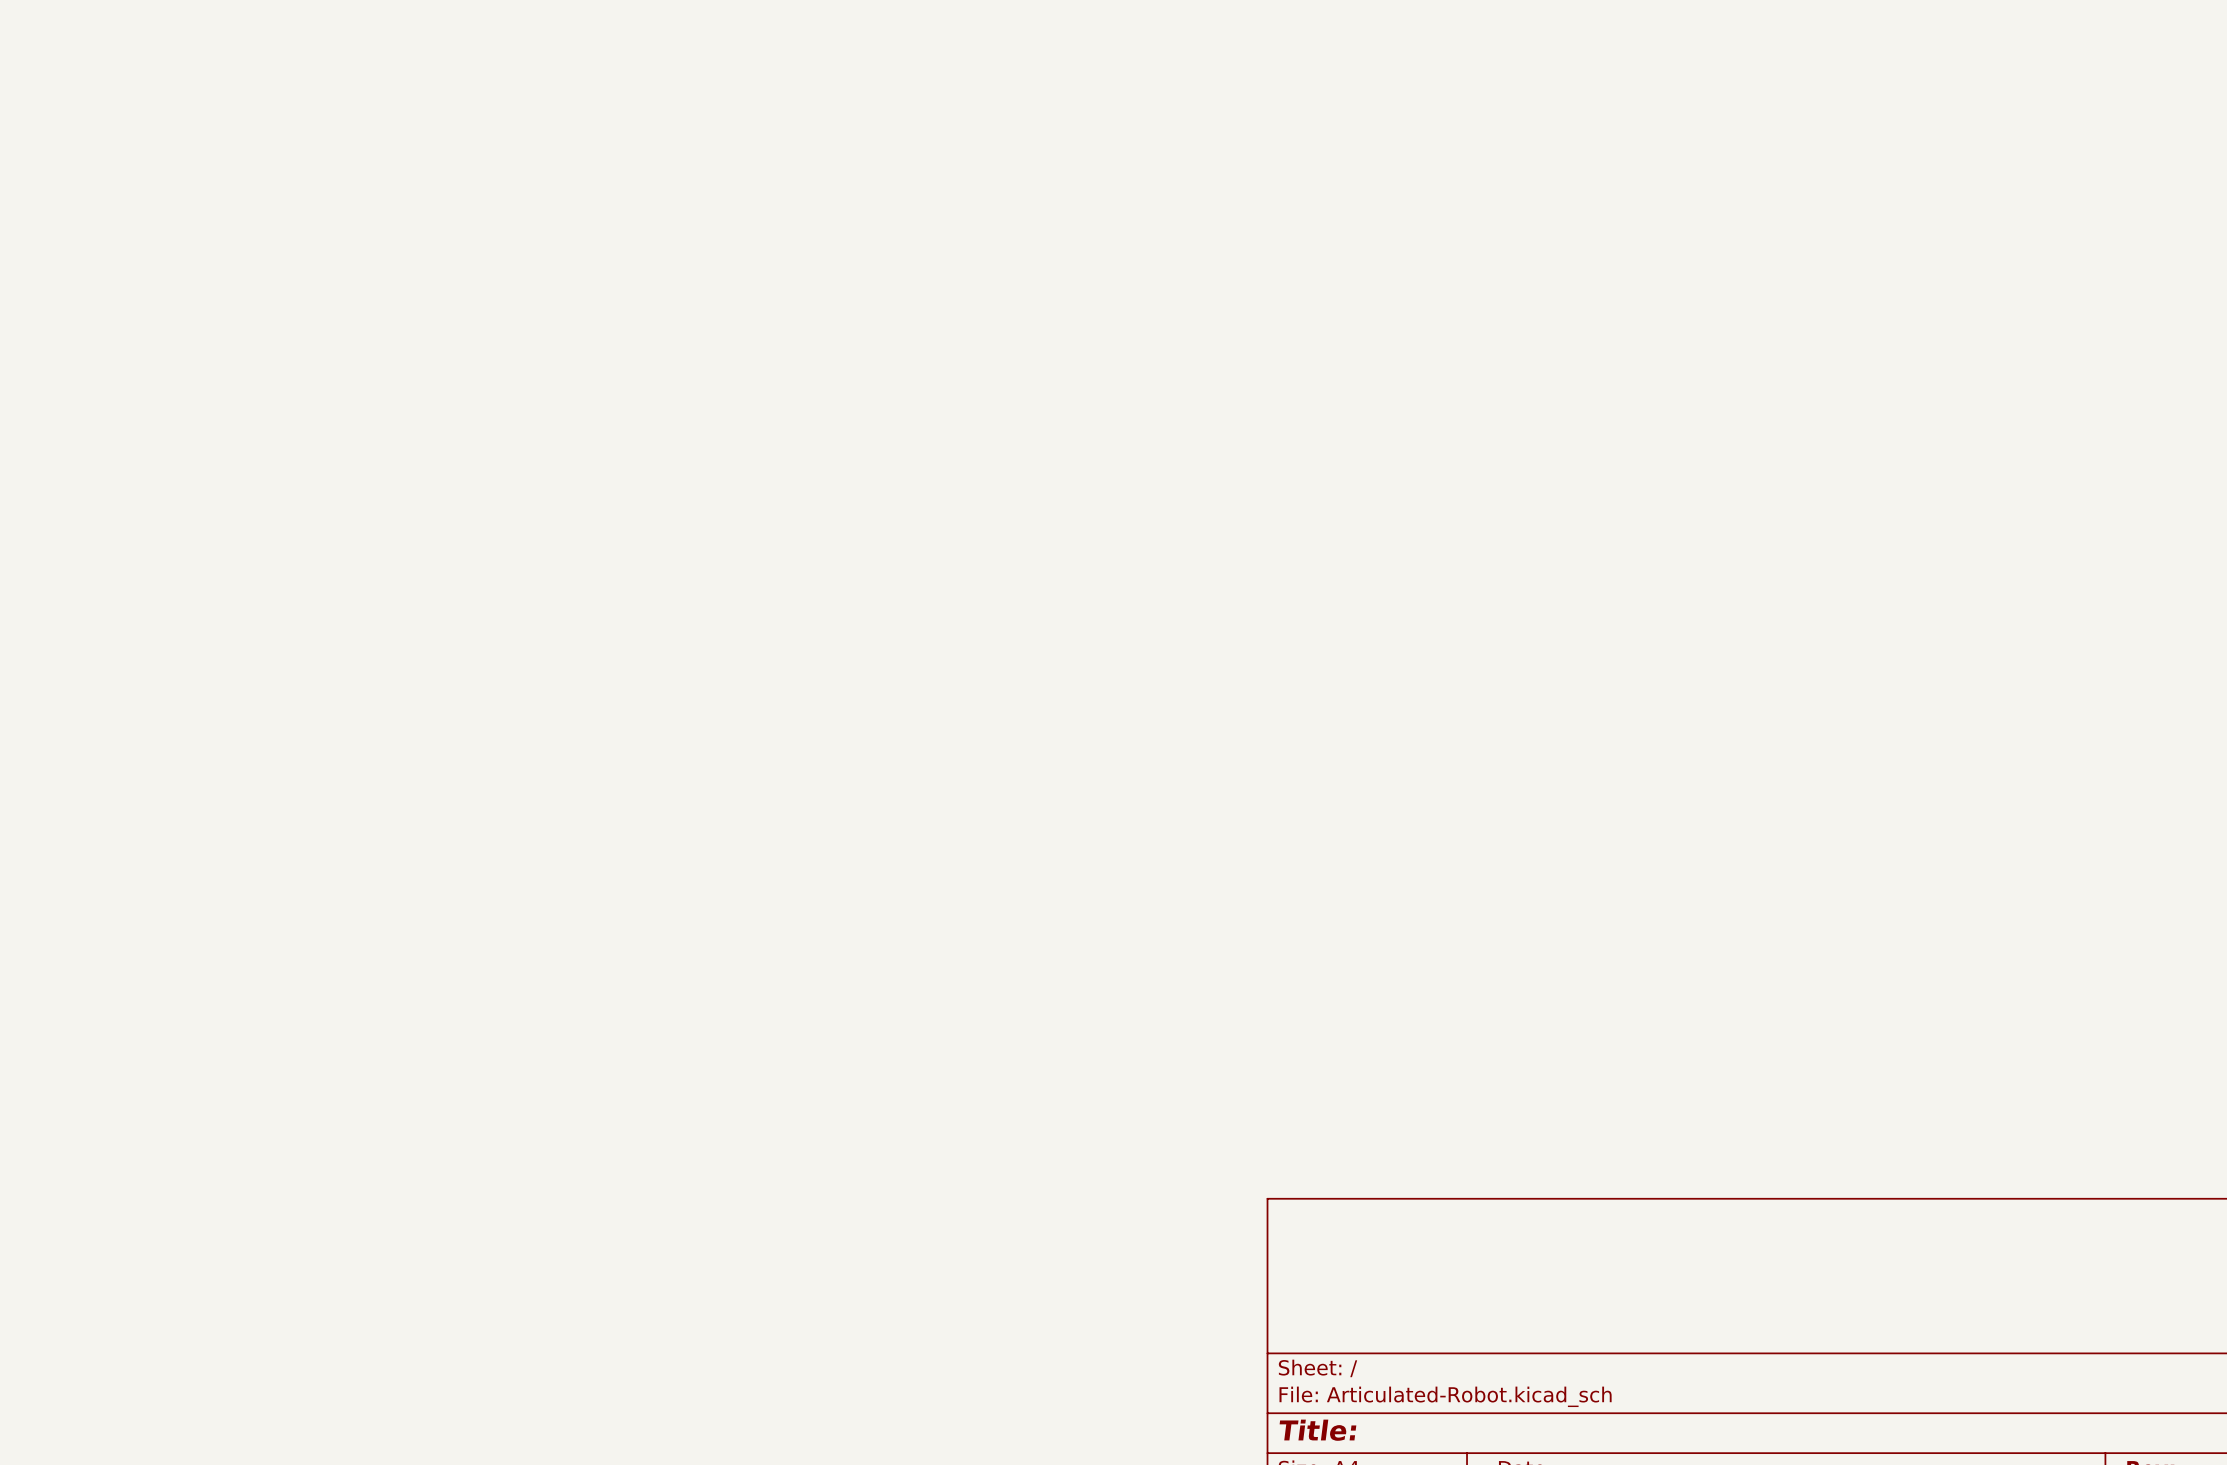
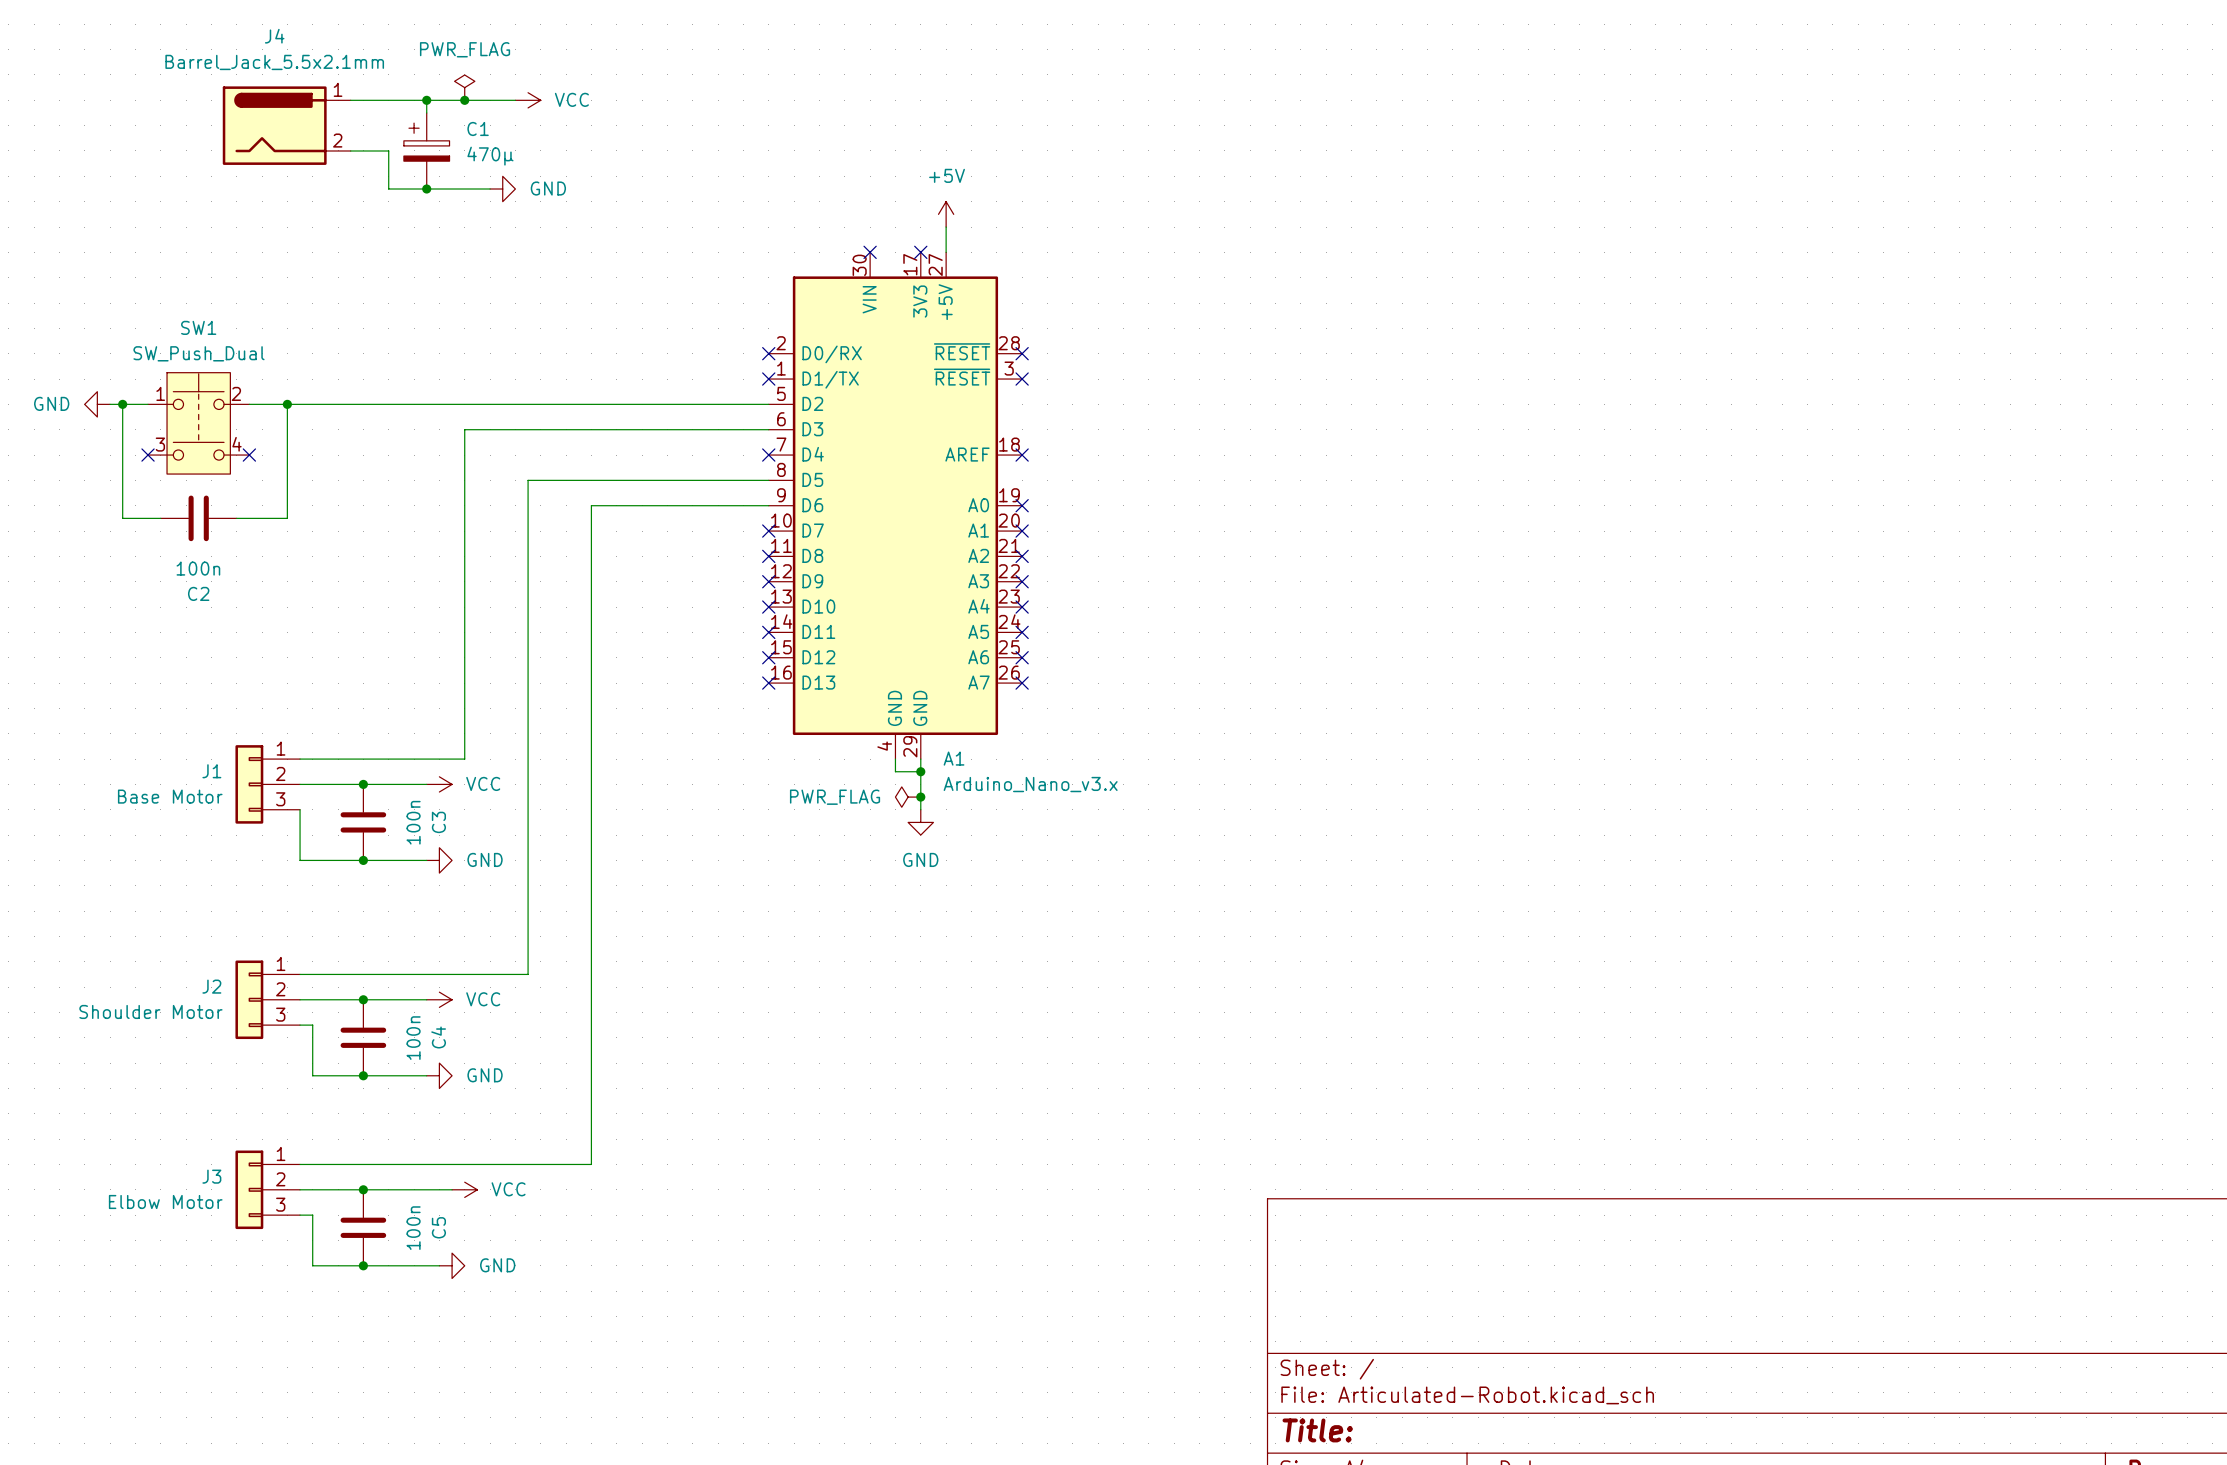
power symbol: none -> PWR_FLAG (464, 87)
wire: none -> (350, 100) (515, 100)
wire: none -> (426, 100) (426, 112)
junction: none -> (426, 100)
junction: none -> (464, 100)
power symbol: none -> VCC (528, 100)
J4: none -> Barrel_Jack_5.5x2.1mm (286, 125)
wire: none -> (350, 150) (388, 150) (388, 189) (490, 189)
C1: none -> 470µ (426, 150)
junction: none -> (426, 189)
power symbol: none -> GND (502, 189)
power symbol: none -> +5V (946, 214)
wire: none -> (946, 227) (946, 252)
no-connect mark: none -> (870, 252)
no-connect mark: none -> (920, 252)
no-connect mark: none -> (768, 353)
no-connect mark: none -> (1022, 353)
no-connect mark: none -> (768, 379)
no-connect mark: none -> (1022, 379)
power symbol: none -> GND (97, 404)
wire: none -> (110, 404) (148, 404)
wire: none -> (122, 404) (122, 518) (160, 518)
junction: none -> (122, 404)
wire: none -> (249, 404) (768, 404)
wire: none -> (287, 404) (287, 518) (236, 518)
junction: none -> (287, 404)
SW1: none -> SW_Push_Dual (198, 423)
wire: none -> (768, 429) (464, 429) (464, 759) (300, 759)
no-connect mark: none -> (148, 455)
no-connect mark: none -> (249, 455)
no-connect mark: none -> (768, 455)
no-connect mark: none -> (1022, 455)
wire: none -> (768, 480) (528, 480) (528, 974) (300, 974)
wire: none -> (768, 505) (591, 505) (591, 1164) (300, 1164)
A1: none -> Arduino_Nano_v3.x (895, 505)
no-connect mark: none -> (1022, 505)
C2: none -> 100n (198, 518)
no-connect mark: none -> (768, 531)
no-connect mark: none -> (1022, 531)
no-connect mark: none -> (768, 556)
no-connect mark: none -> (1022, 556)
no-connect mark: none -> (768, 581)
no-connect mark: none -> (1022, 581)
no-connect mark: none -> (768, 607)
no-connect mark: none -> (1022, 607)
no-connect mark: none -> (768, 632)
no-connect mark: none -> (1022, 632)
no-connect mark: none -> (768, 657)
no-connect mark: none -> (1022, 657)
no-connect mark: none -> (768, 683)
no-connect mark: none -> (1022, 683)
wire: none -> (895, 759) (895, 771) (920, 771)
wire: none -> (920, 759) (920, 809)
junction: none -> (920, 771)
J1: none -> Base Motor (267, 784)
wire: none -> (300, 784) (426, 784)
junction: none -> (363, 784)
power symbol: none -> VCC (439, 784)
power symbol: none -> PWR_FLAG (908, 797)
junction: none -> (920, 797)
wire: none -> (300, 809) (300, 860) (426, 860)
C3: none -> 100n (363, 822)
power symbol: none -> GND (920, 822)
junction: none -> (363, 860)
power symbol: none -> GND (439, 860)
J2: none -> Shoulder Motor (267, 999)
wire: none -> (300, 999) (426, 999)
junction: none -> (363, 999)
power symbol: none -> VCC (439, 999)
wire: none -> (300, 1025) (312, 1025) (312, 1075) (426, 1075)
C4: none -> 100n (363, 1037)
junction: none -> (363, 1075)
power symbol: none -> GND (439, 1075)
J3: none -> Elbow Motor (267, 1189)
wire: none -> (300, 1189) (452, 1189)
junction: none -> (363, 1189)
power symbol: none -> VCC (464, 1189)
wire: none -> (300, 1215) (312, 1215) (312, 1265) (439, 1265)
C5: none -> 100n (363, 1227)
junction: none -> (363, 1265)
power symbol: none -> GND (452, 1265)

